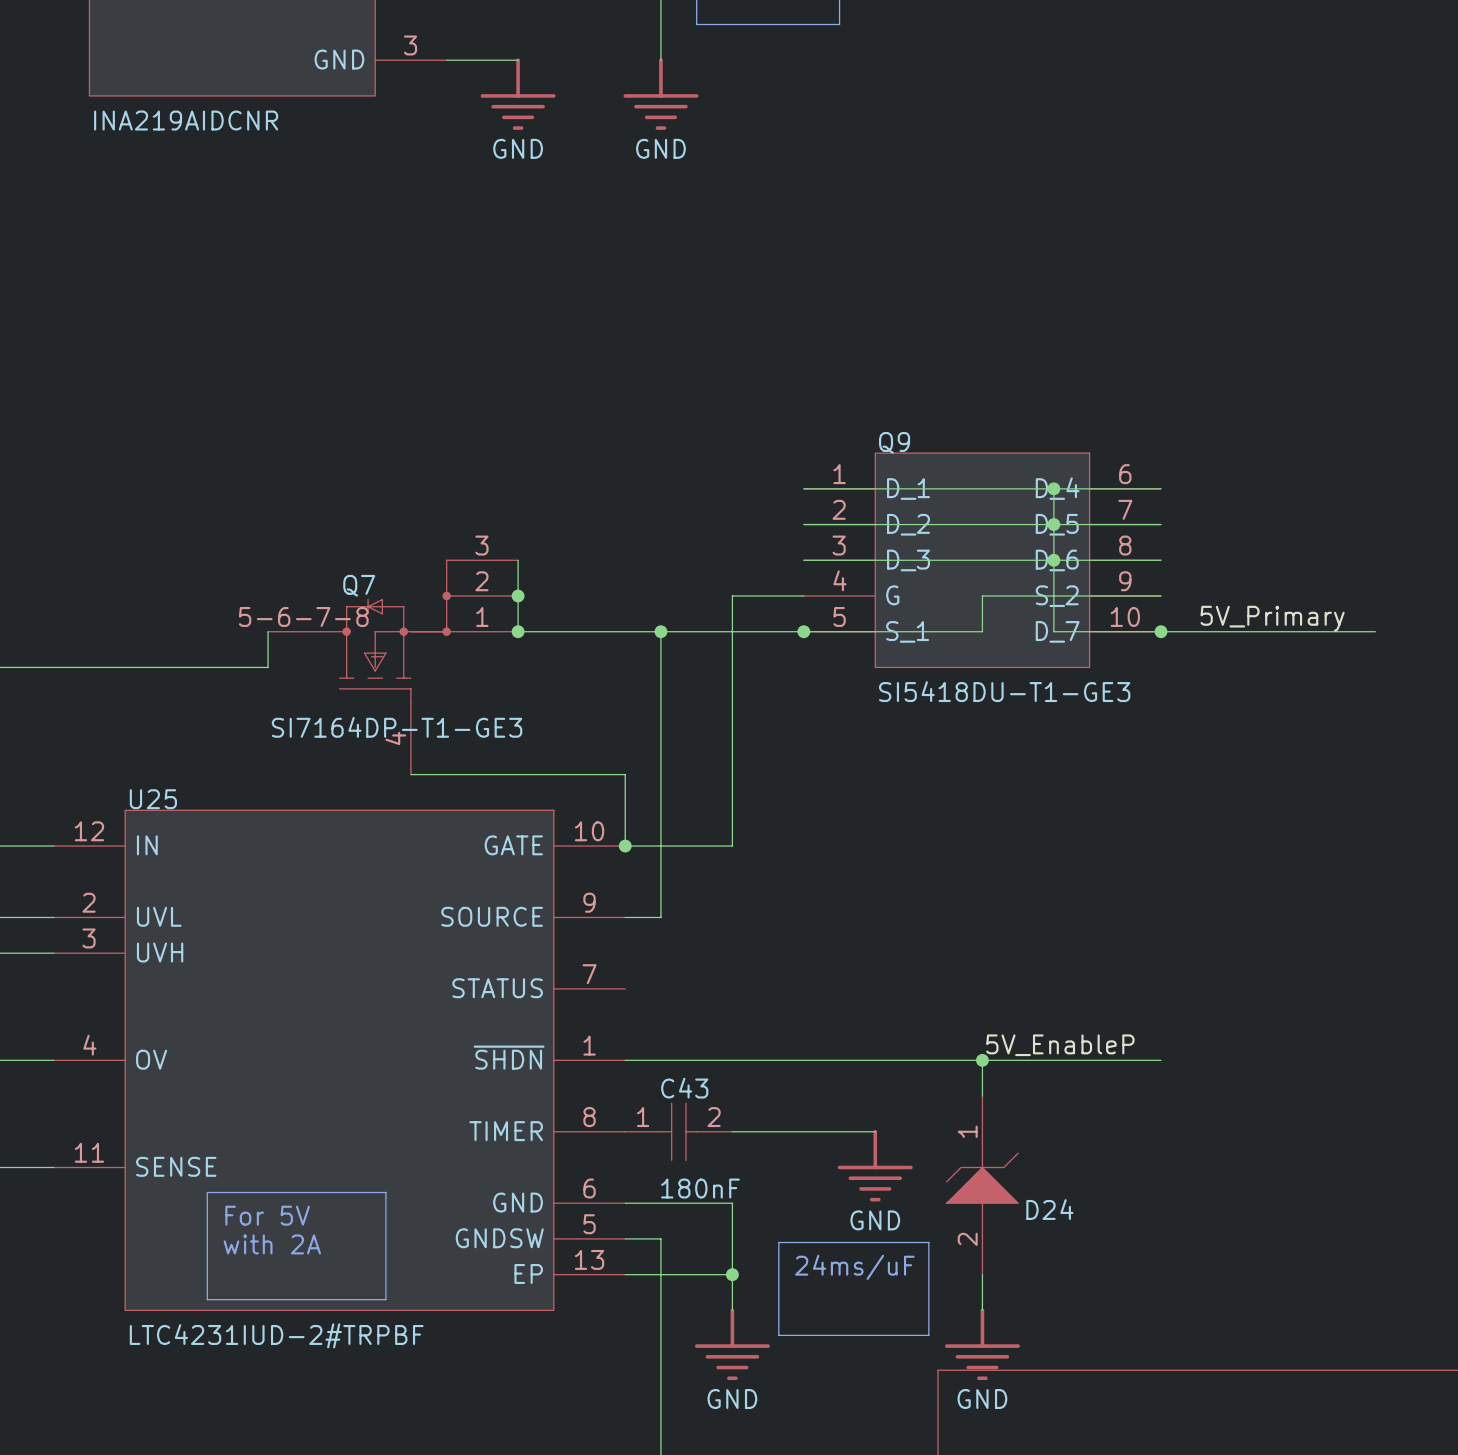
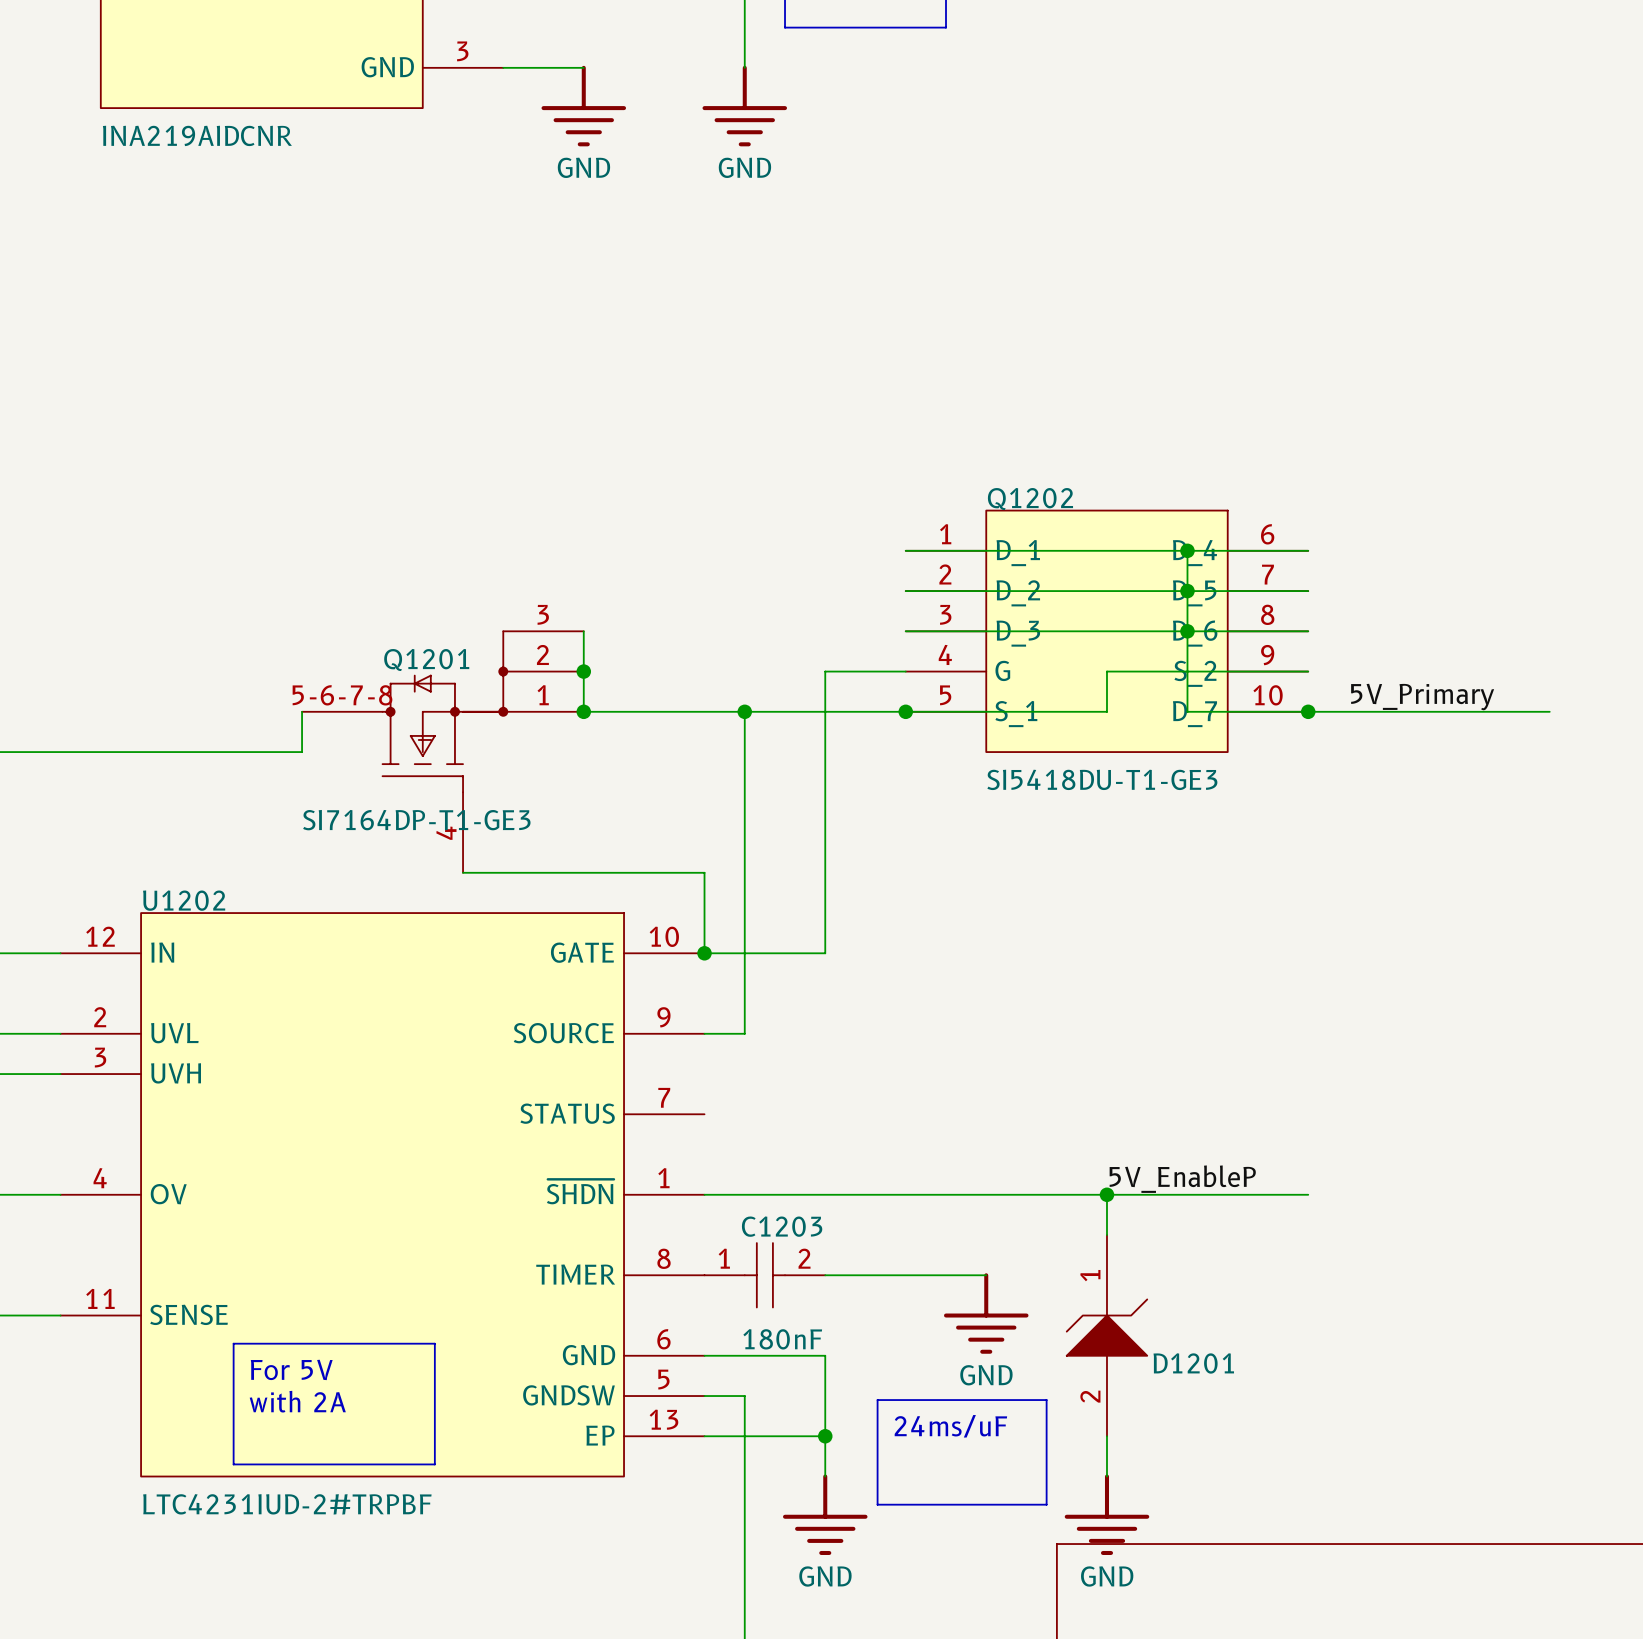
Q9 name: Q9 (894, 442) -> Q1202 (1030, 499)
Q7 name: Q7 (359, 585) -> Q1201 (426, 659)
U25 name: U25 (153, 799) -> U1202 (184, 900)
C43 name: C43 (684, 1088) -> C1203 (782, 1226)
D24 name: D24 (1049, 1209) -> D1201 (1193, 1363)

